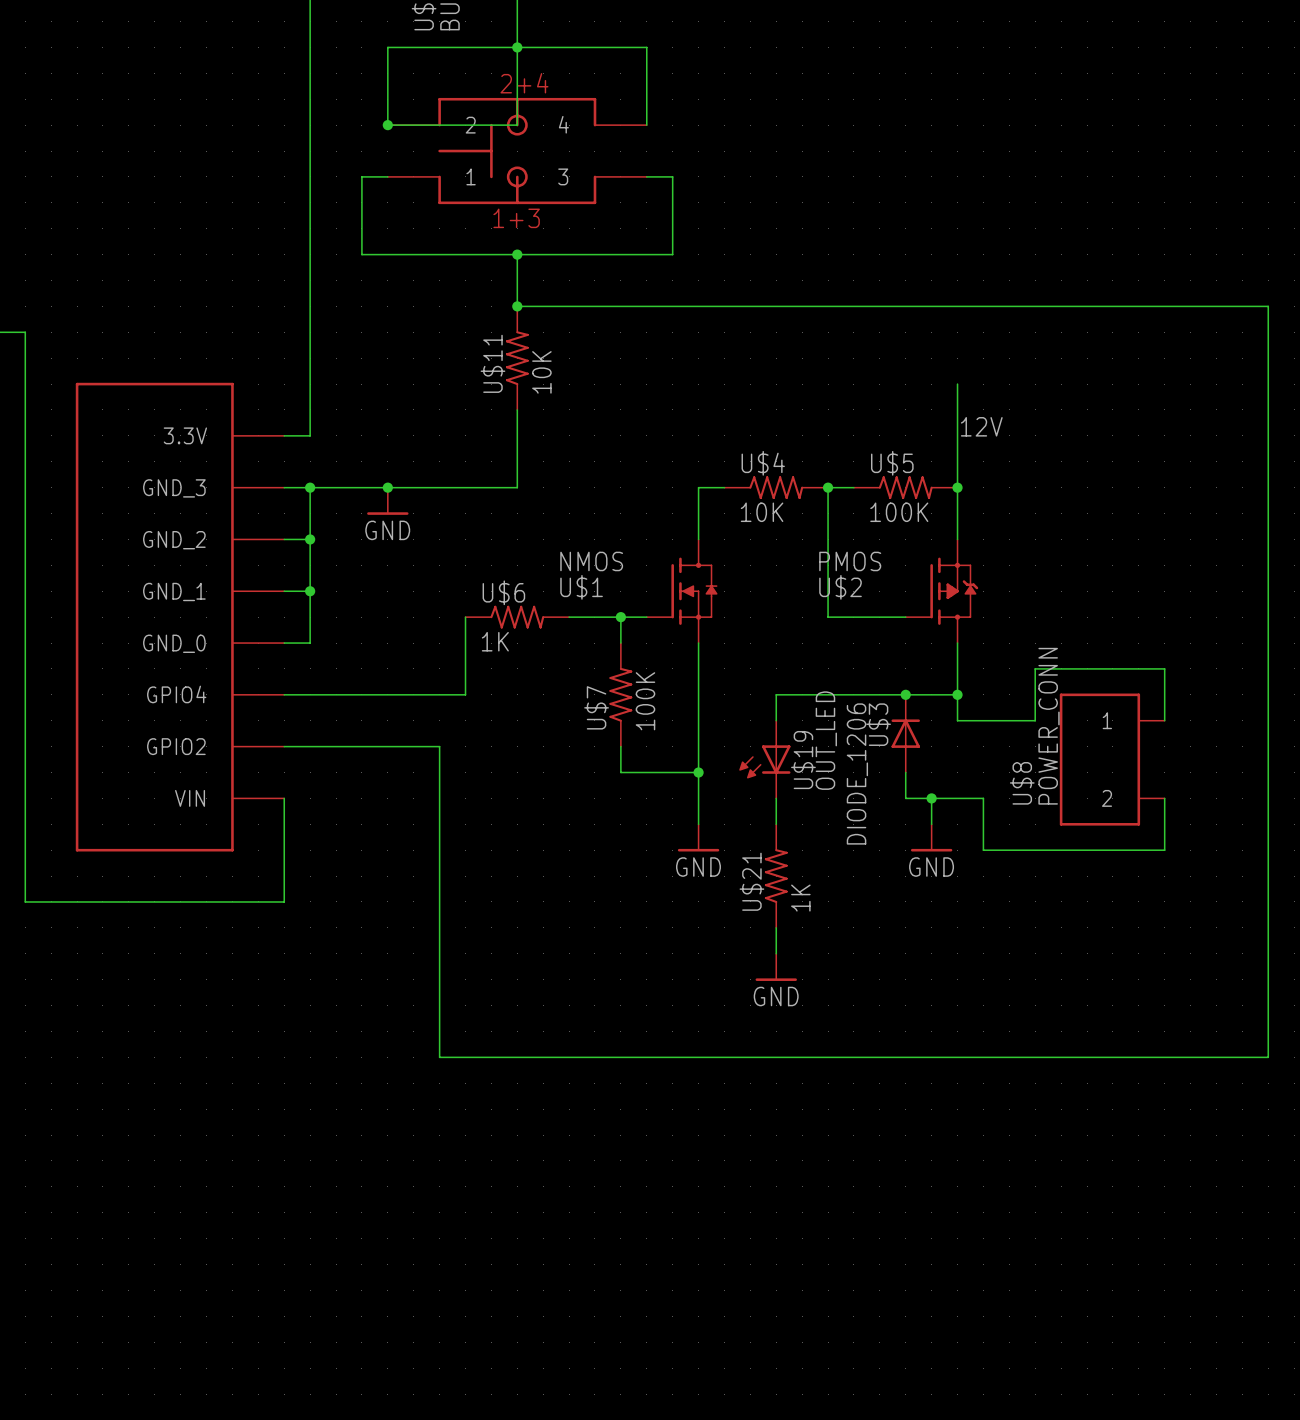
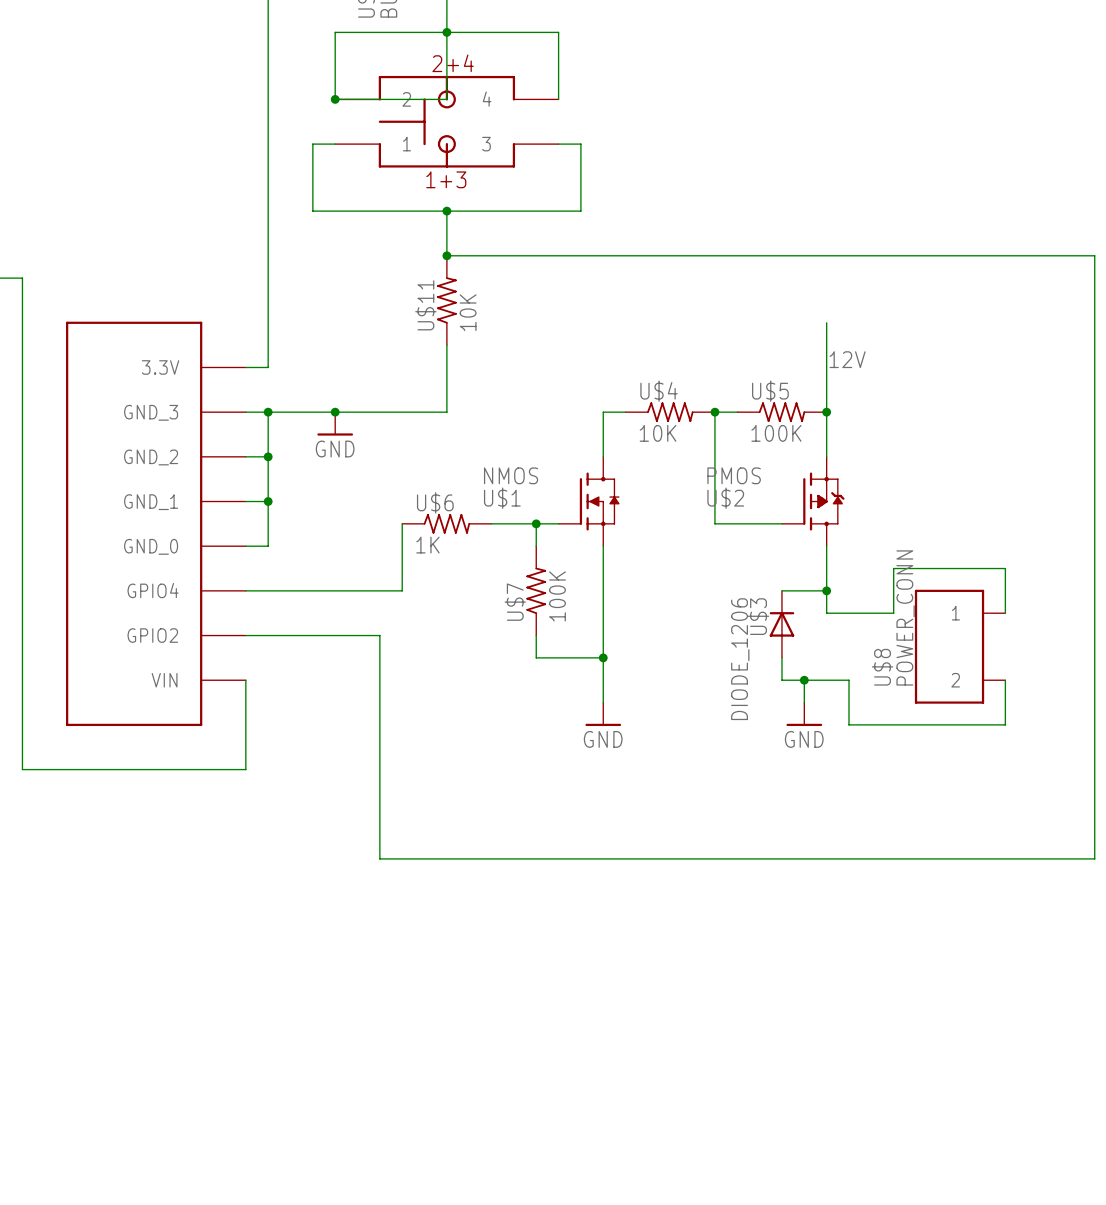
wire: (905, 694) (776, 694) (776, 720) -> none
junction: (905, 694) -> none
U$19: OUT_LED (764, 759) -> none
wire: (776, 798) (776, 824) -> none
U$21: 1K (776, 876) -> none
wire: (776, 927) (776, 953) -> none
power symbol: GND (776, 967) -> none
wire: (439, 1005) (439, 1057) (1268, 1057) (1268, 1005) -> (379, 858) (1094, 858)

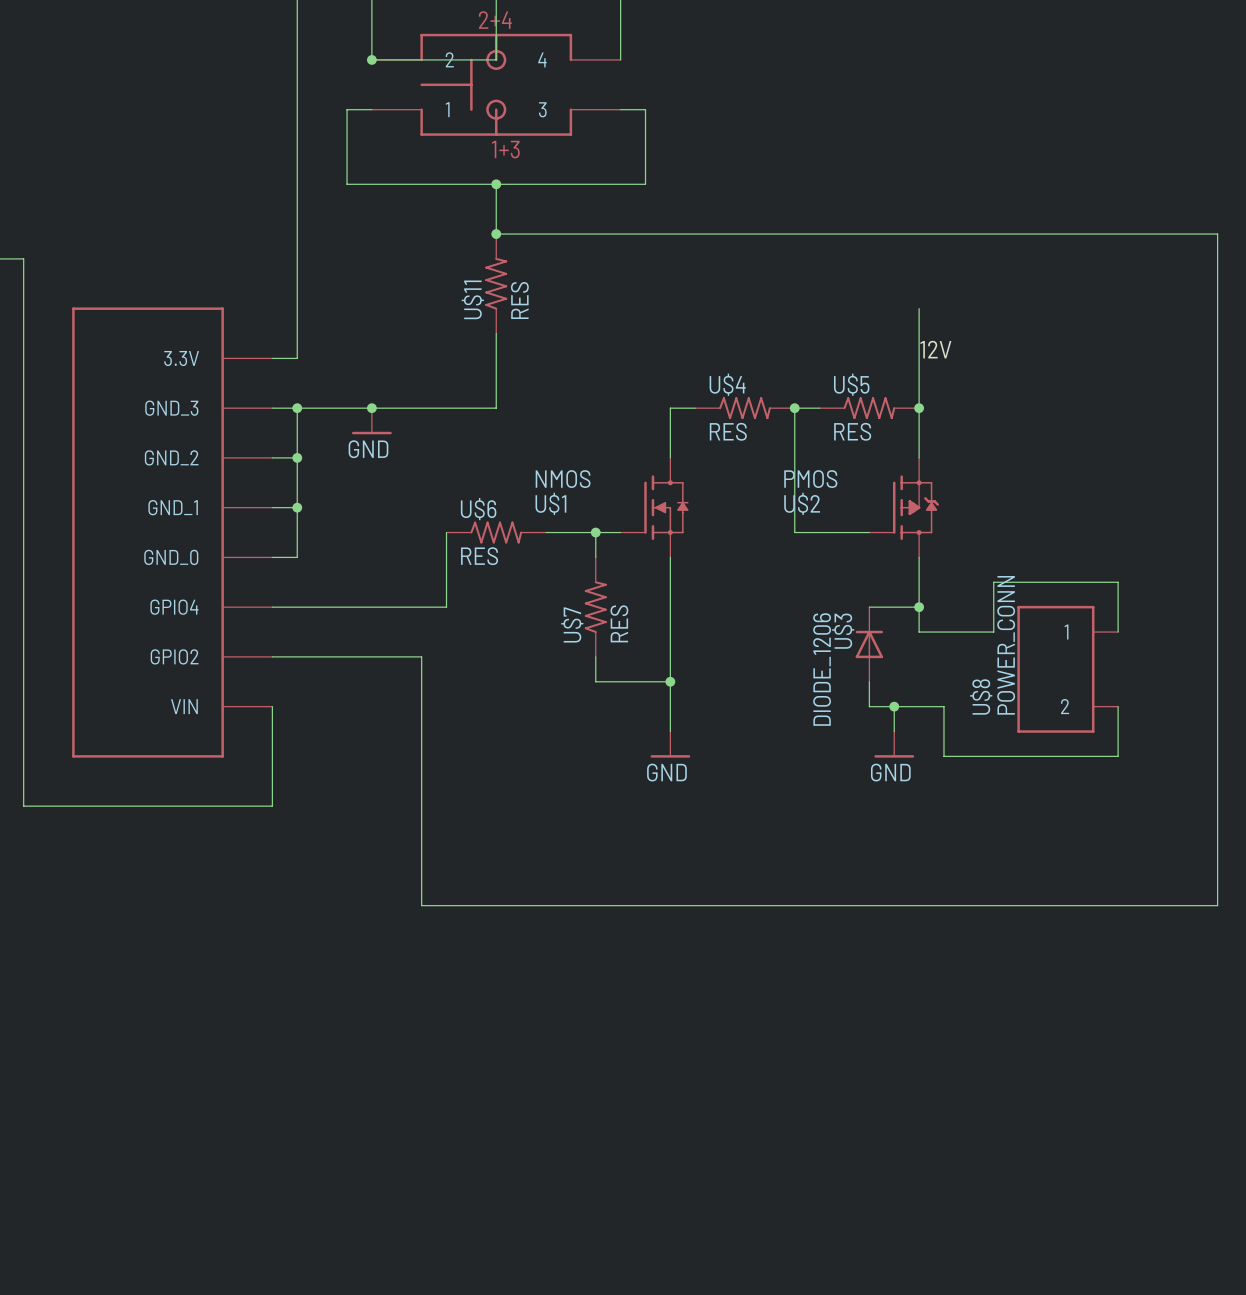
U$11 value: 10K (468, 312) -> RES (519, 300)
U$4 value: 10K (658, 433) -> RES (728, 431)
U$5 value: 100K (776, 433) -> RES (852, 431)
U$6 value: 1K (427, 545) -> RES (479, 556)
U$7 value: 100K (557, 596) -> RES (619, 623)

